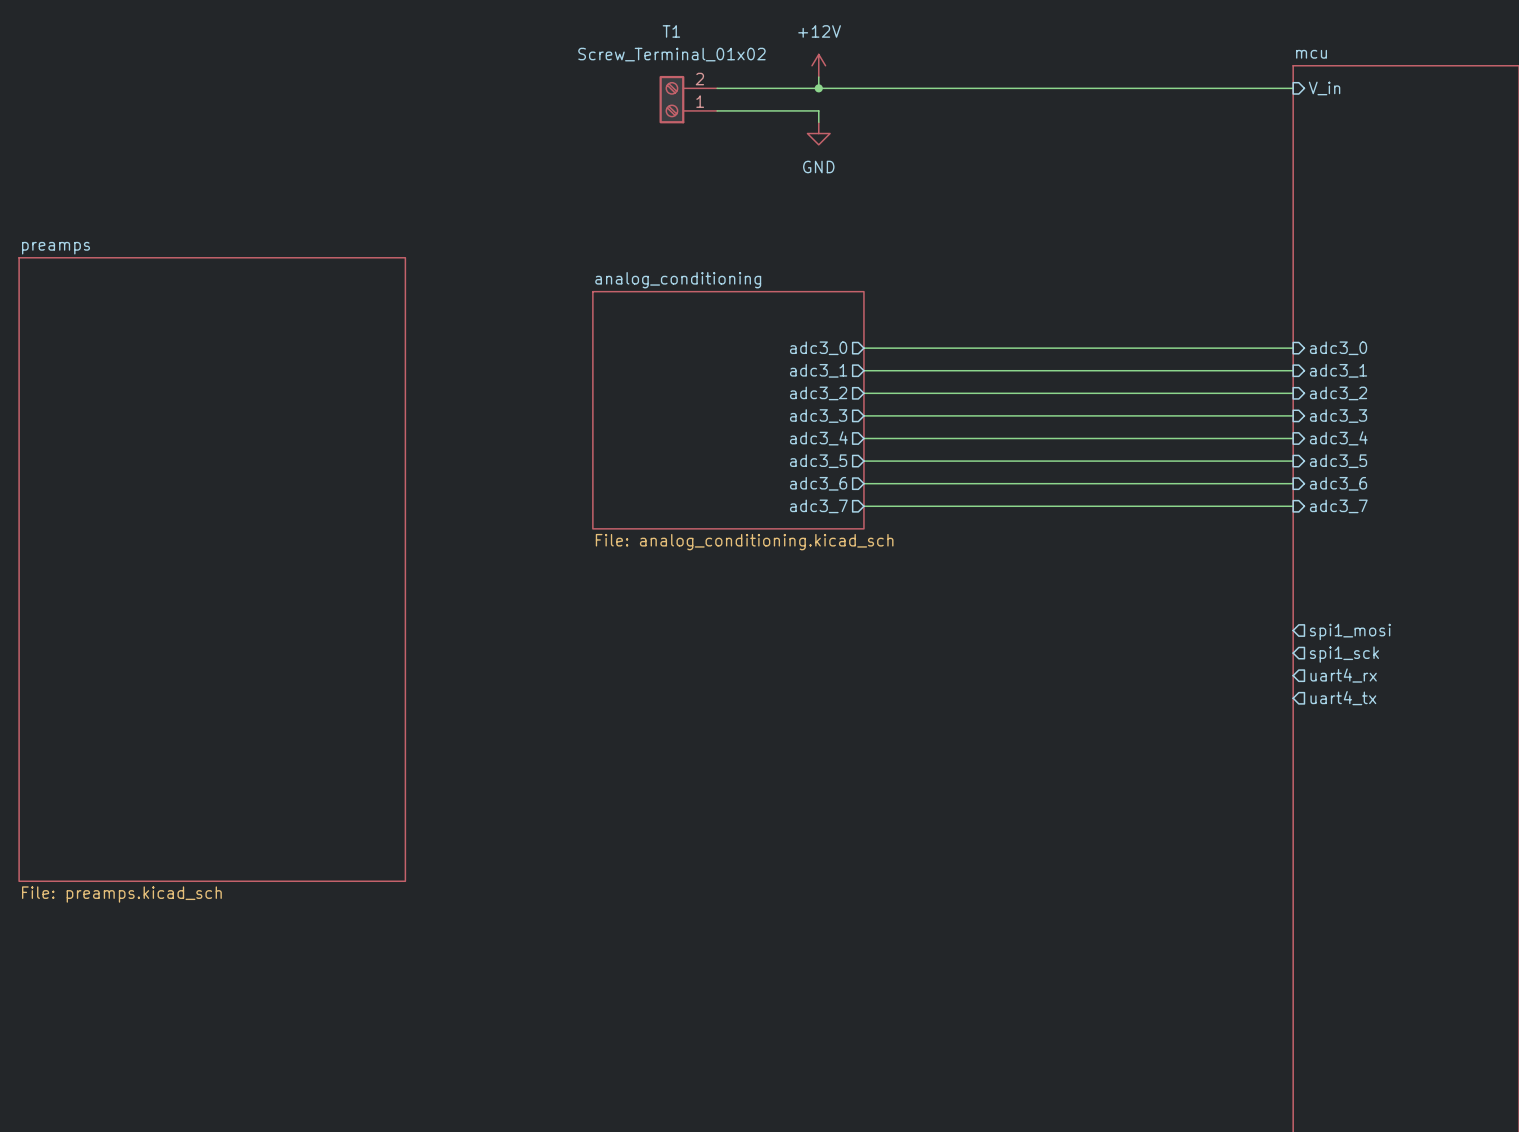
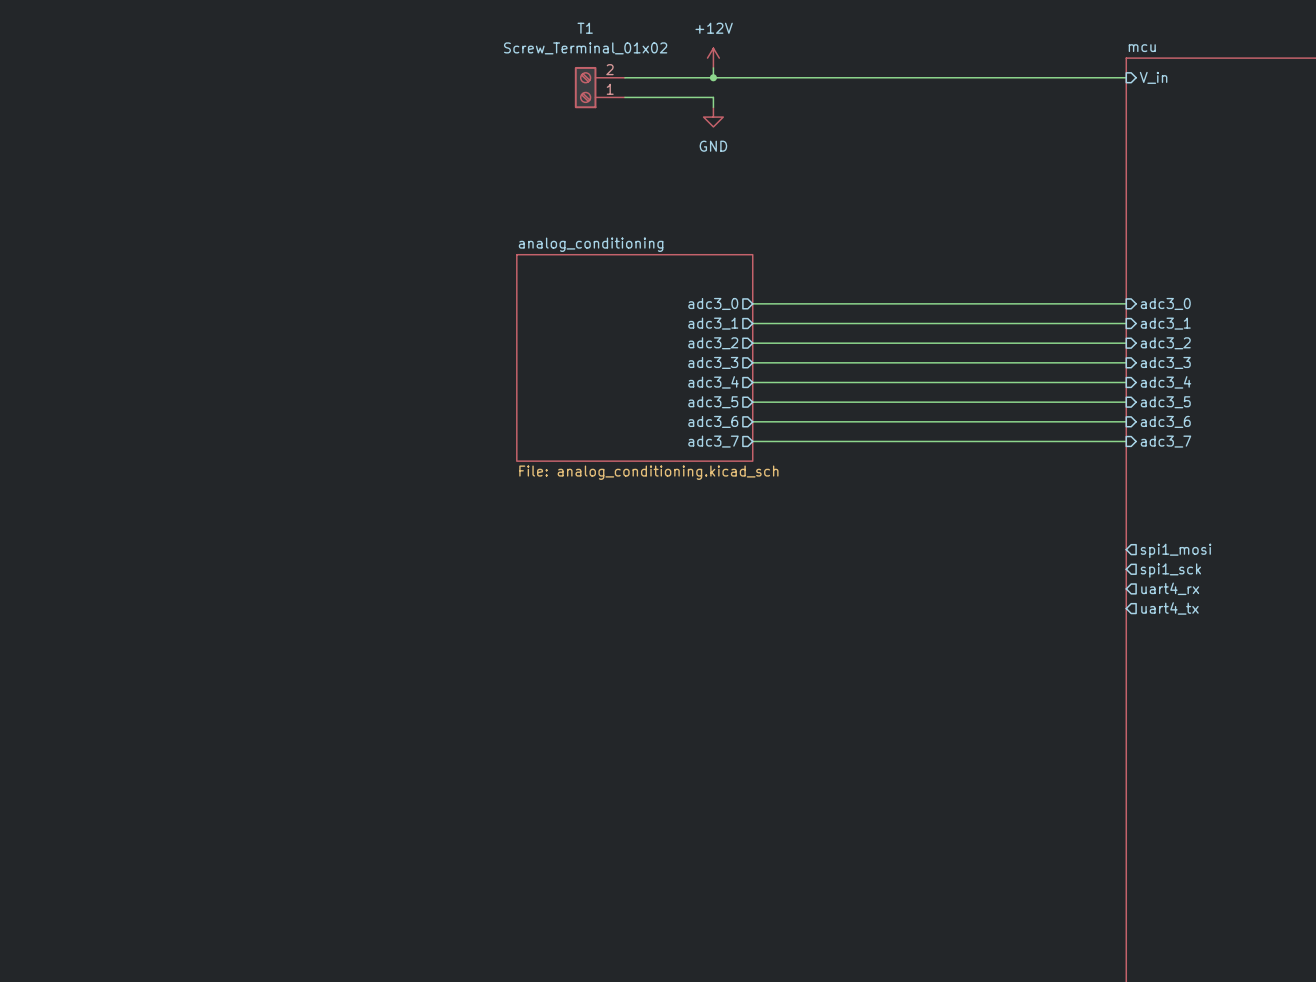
sheet preamps: File: preamps.kicad_sch (212, 569) -> none

